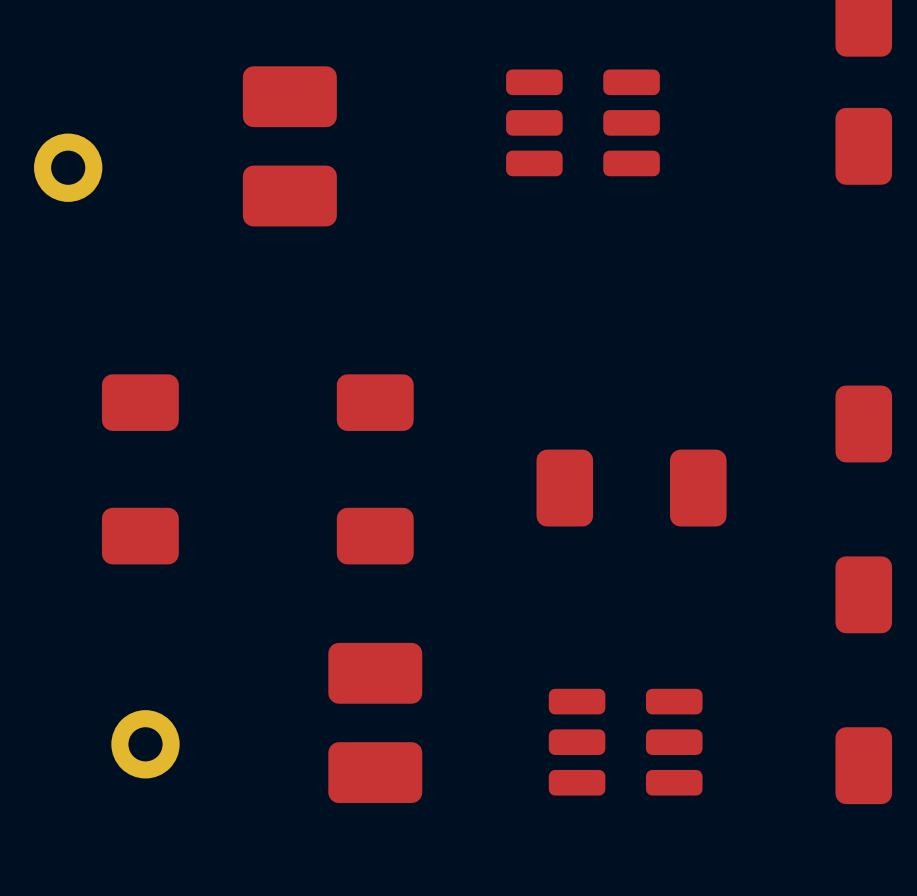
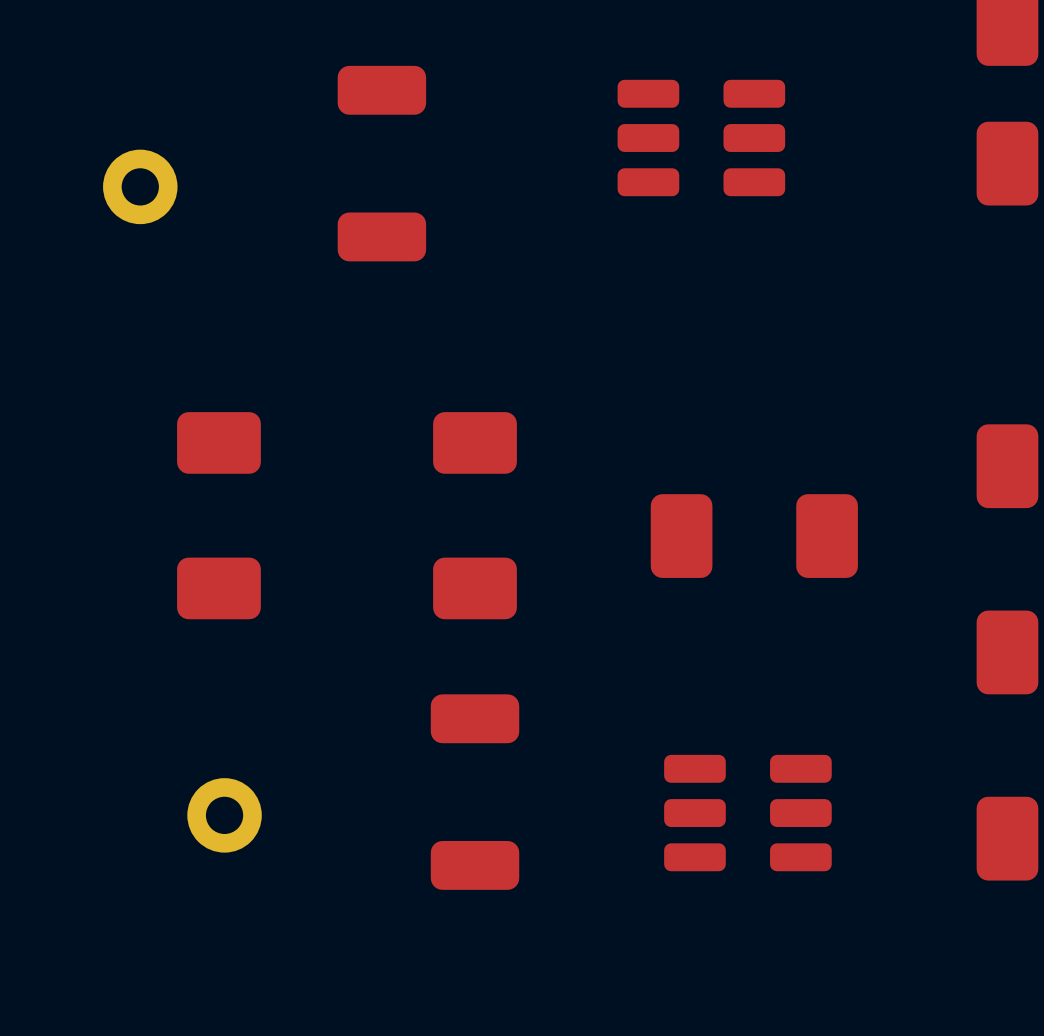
part footprint: [242, 66, 337, 227] -> [337, 65, 427, 262]
part footprint: [328, 642, 423, 804] -> [430, 694, 520, 890]

